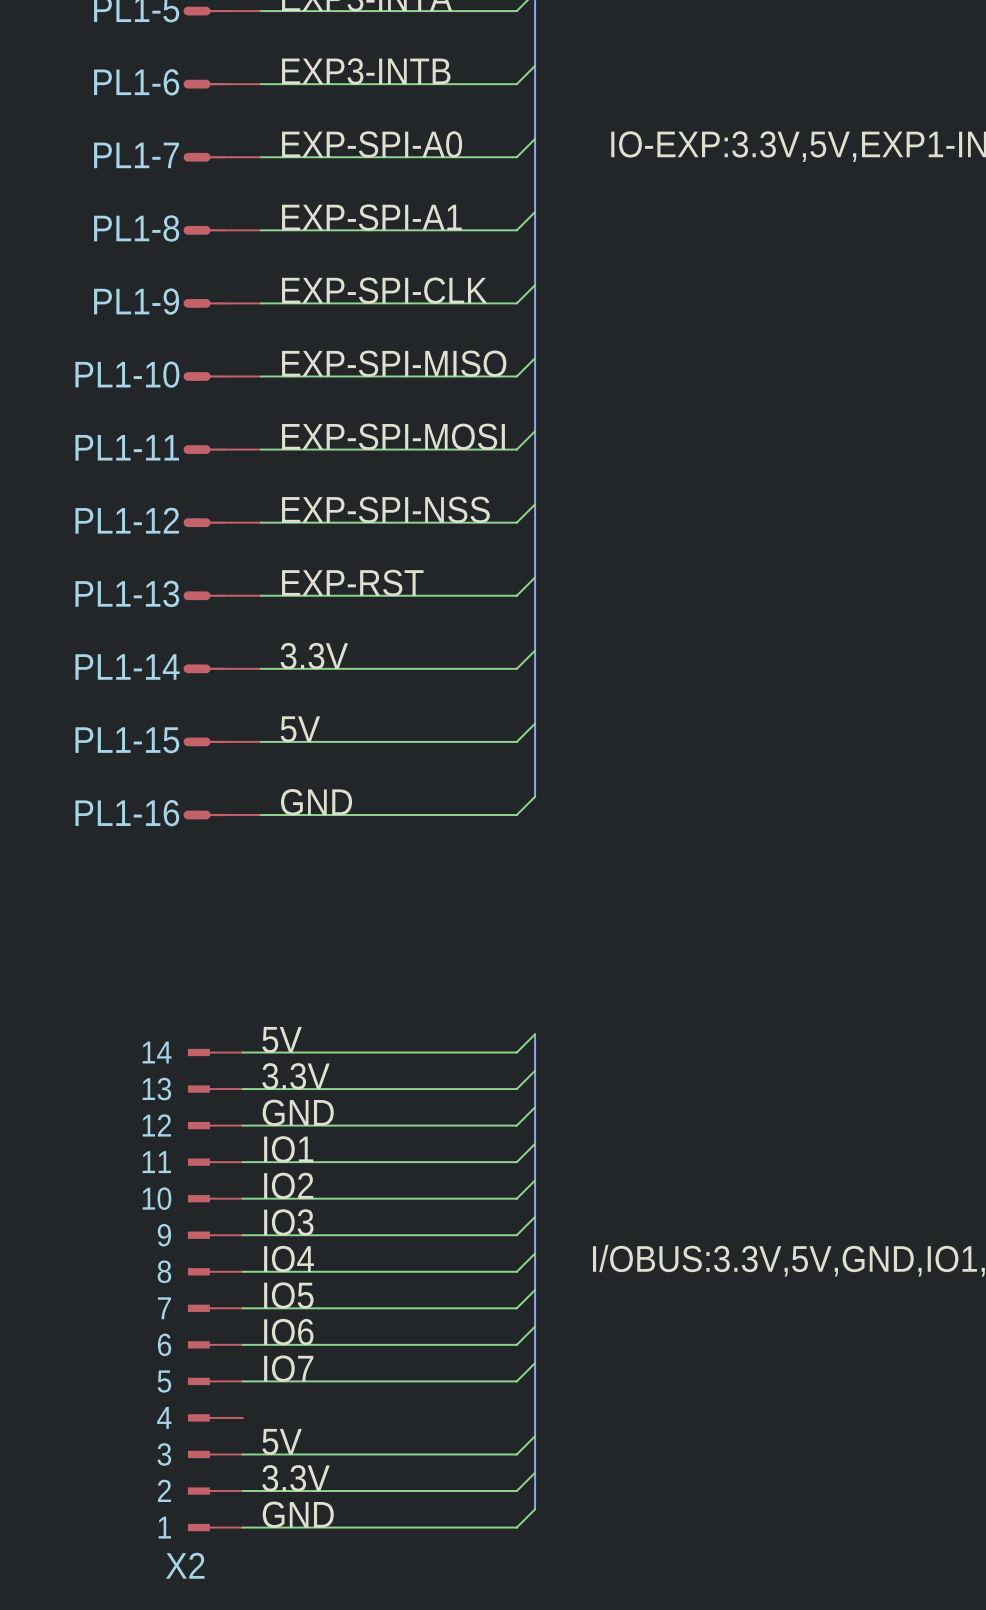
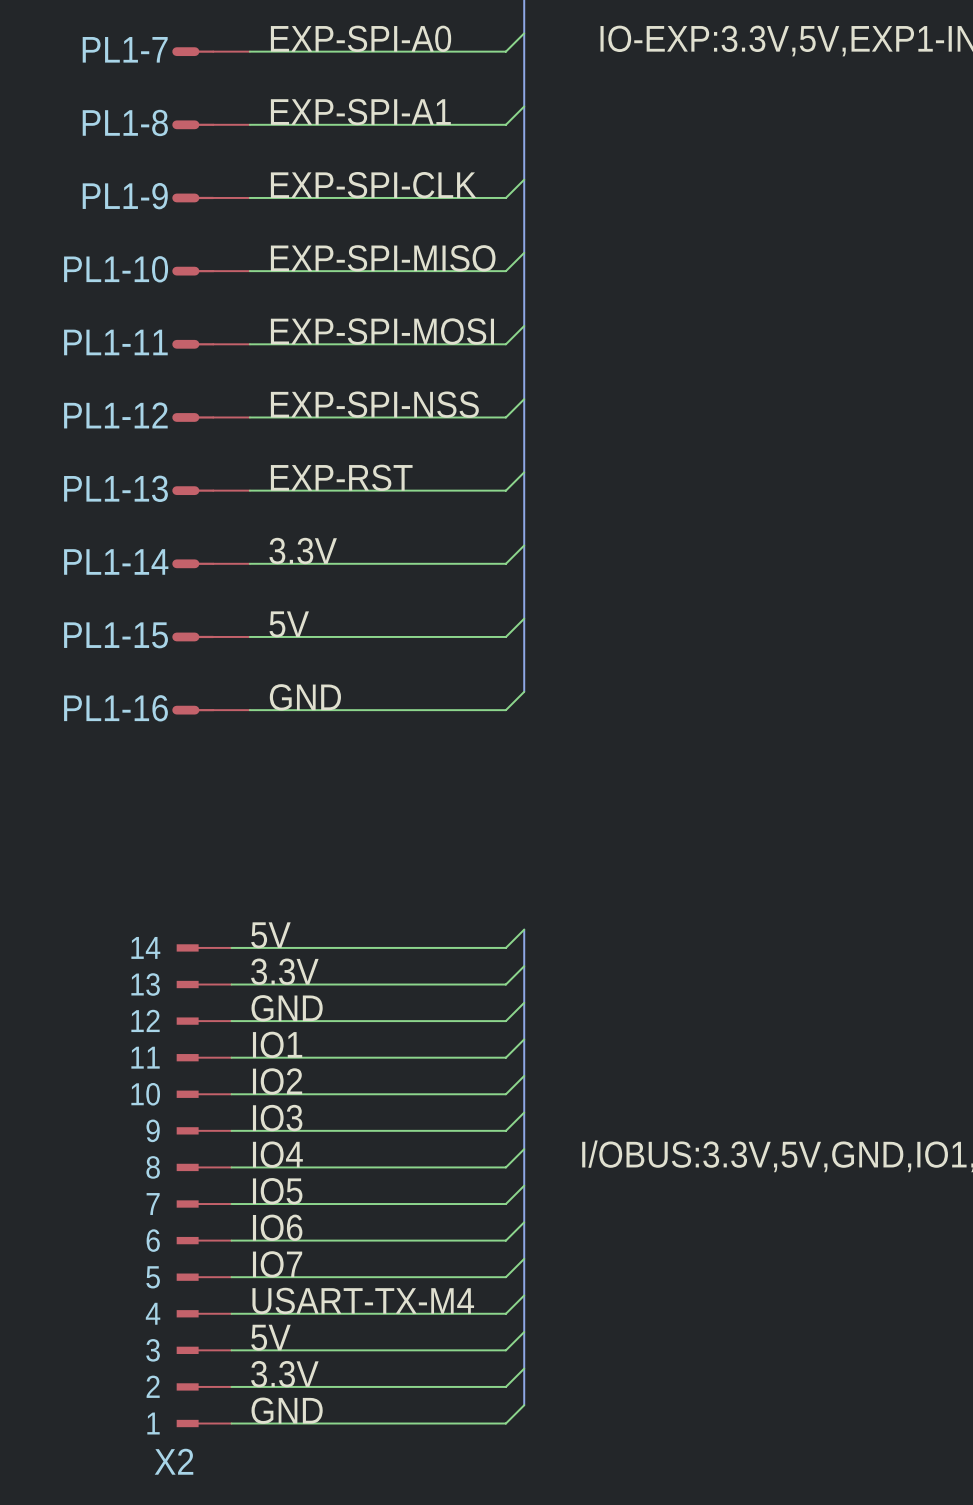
wire: none -> (524, 1295) (505, 1313) (231, 1313)
label: none -> USART-TX-M4 (363, 1300)

